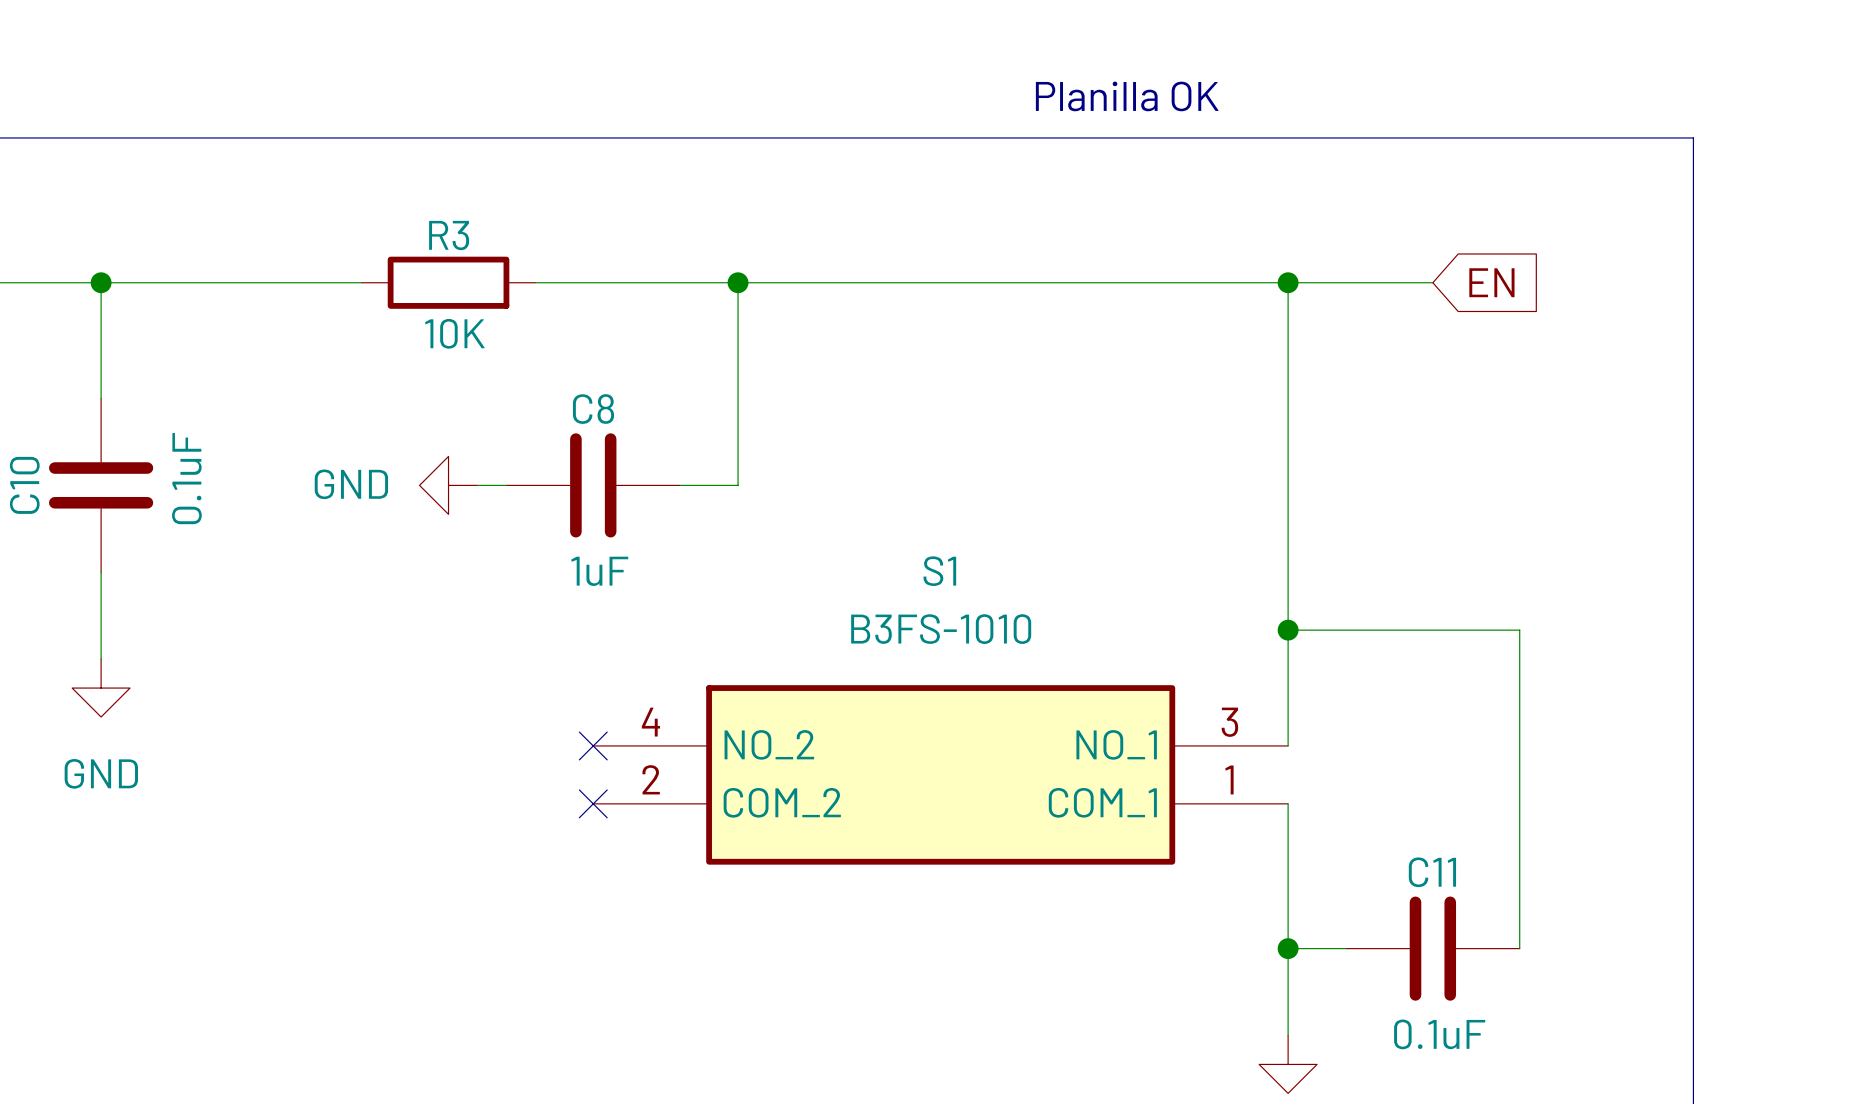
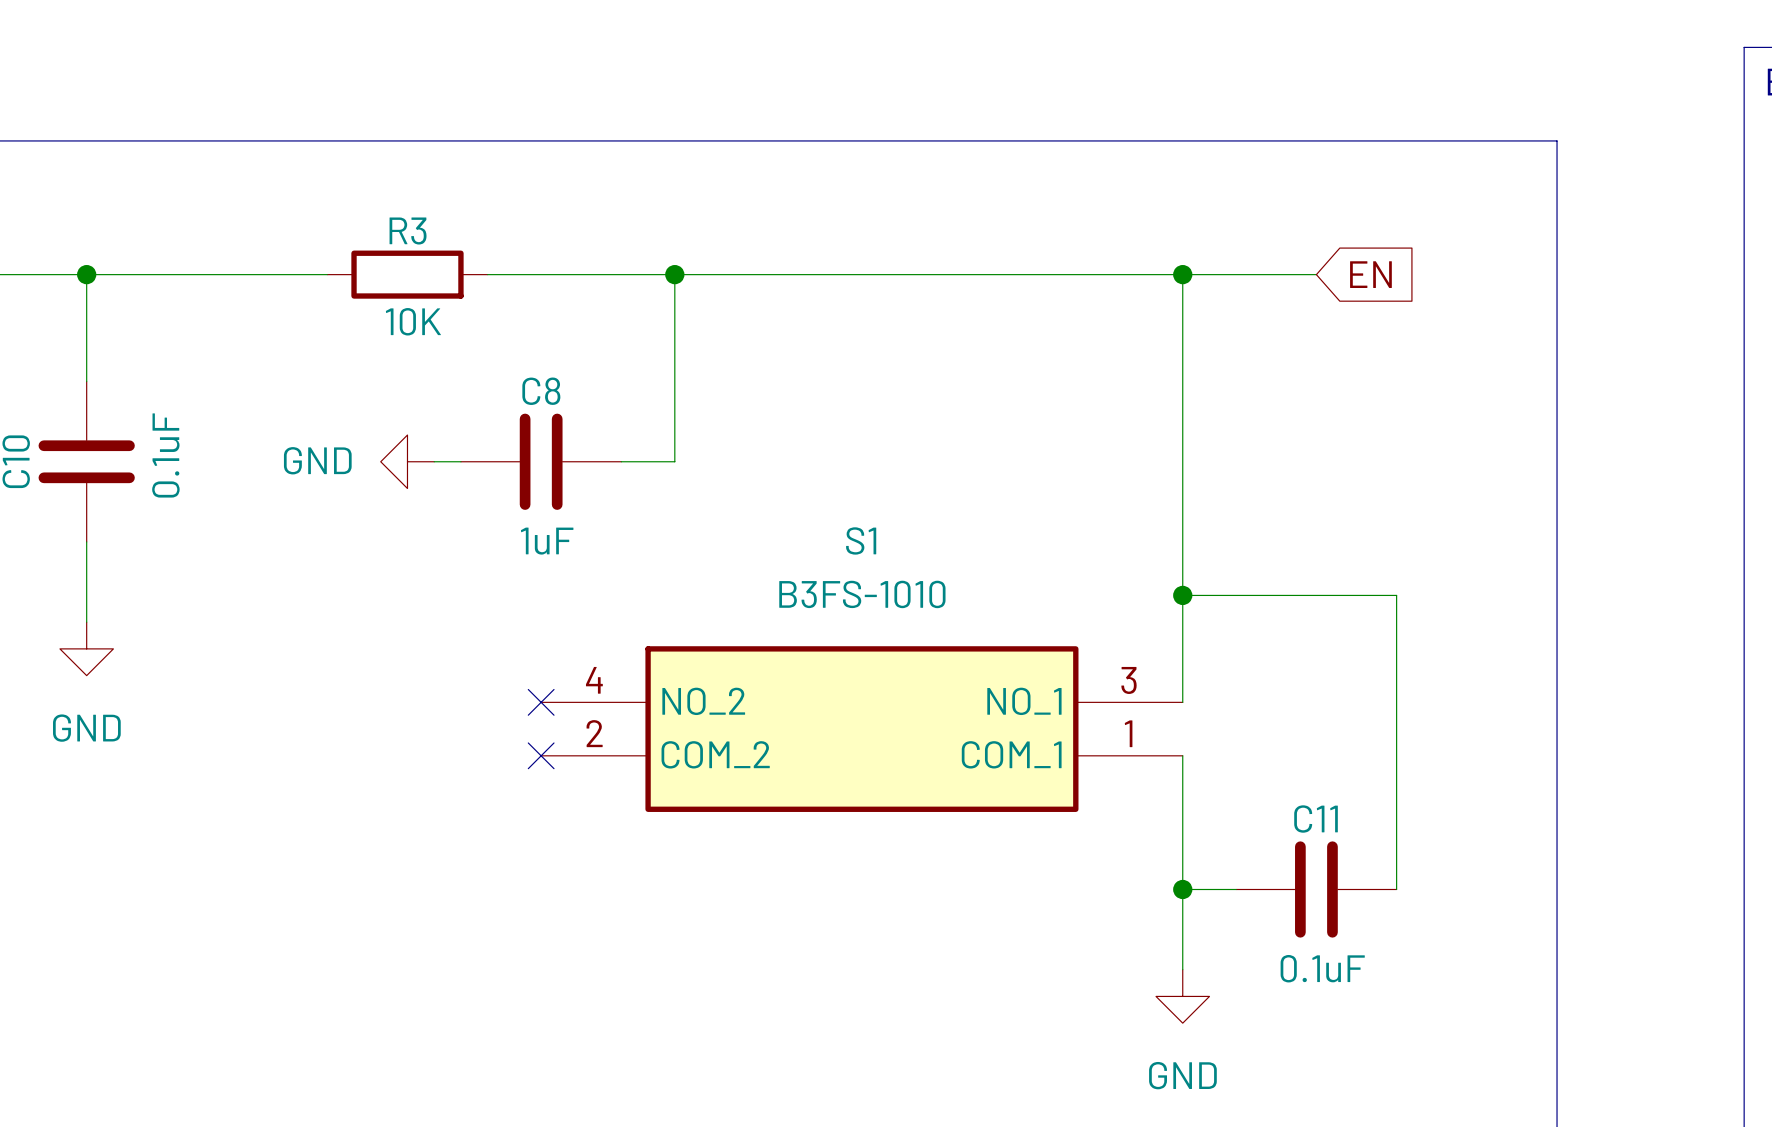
text: Planilla OK (1127, 96) -> none

